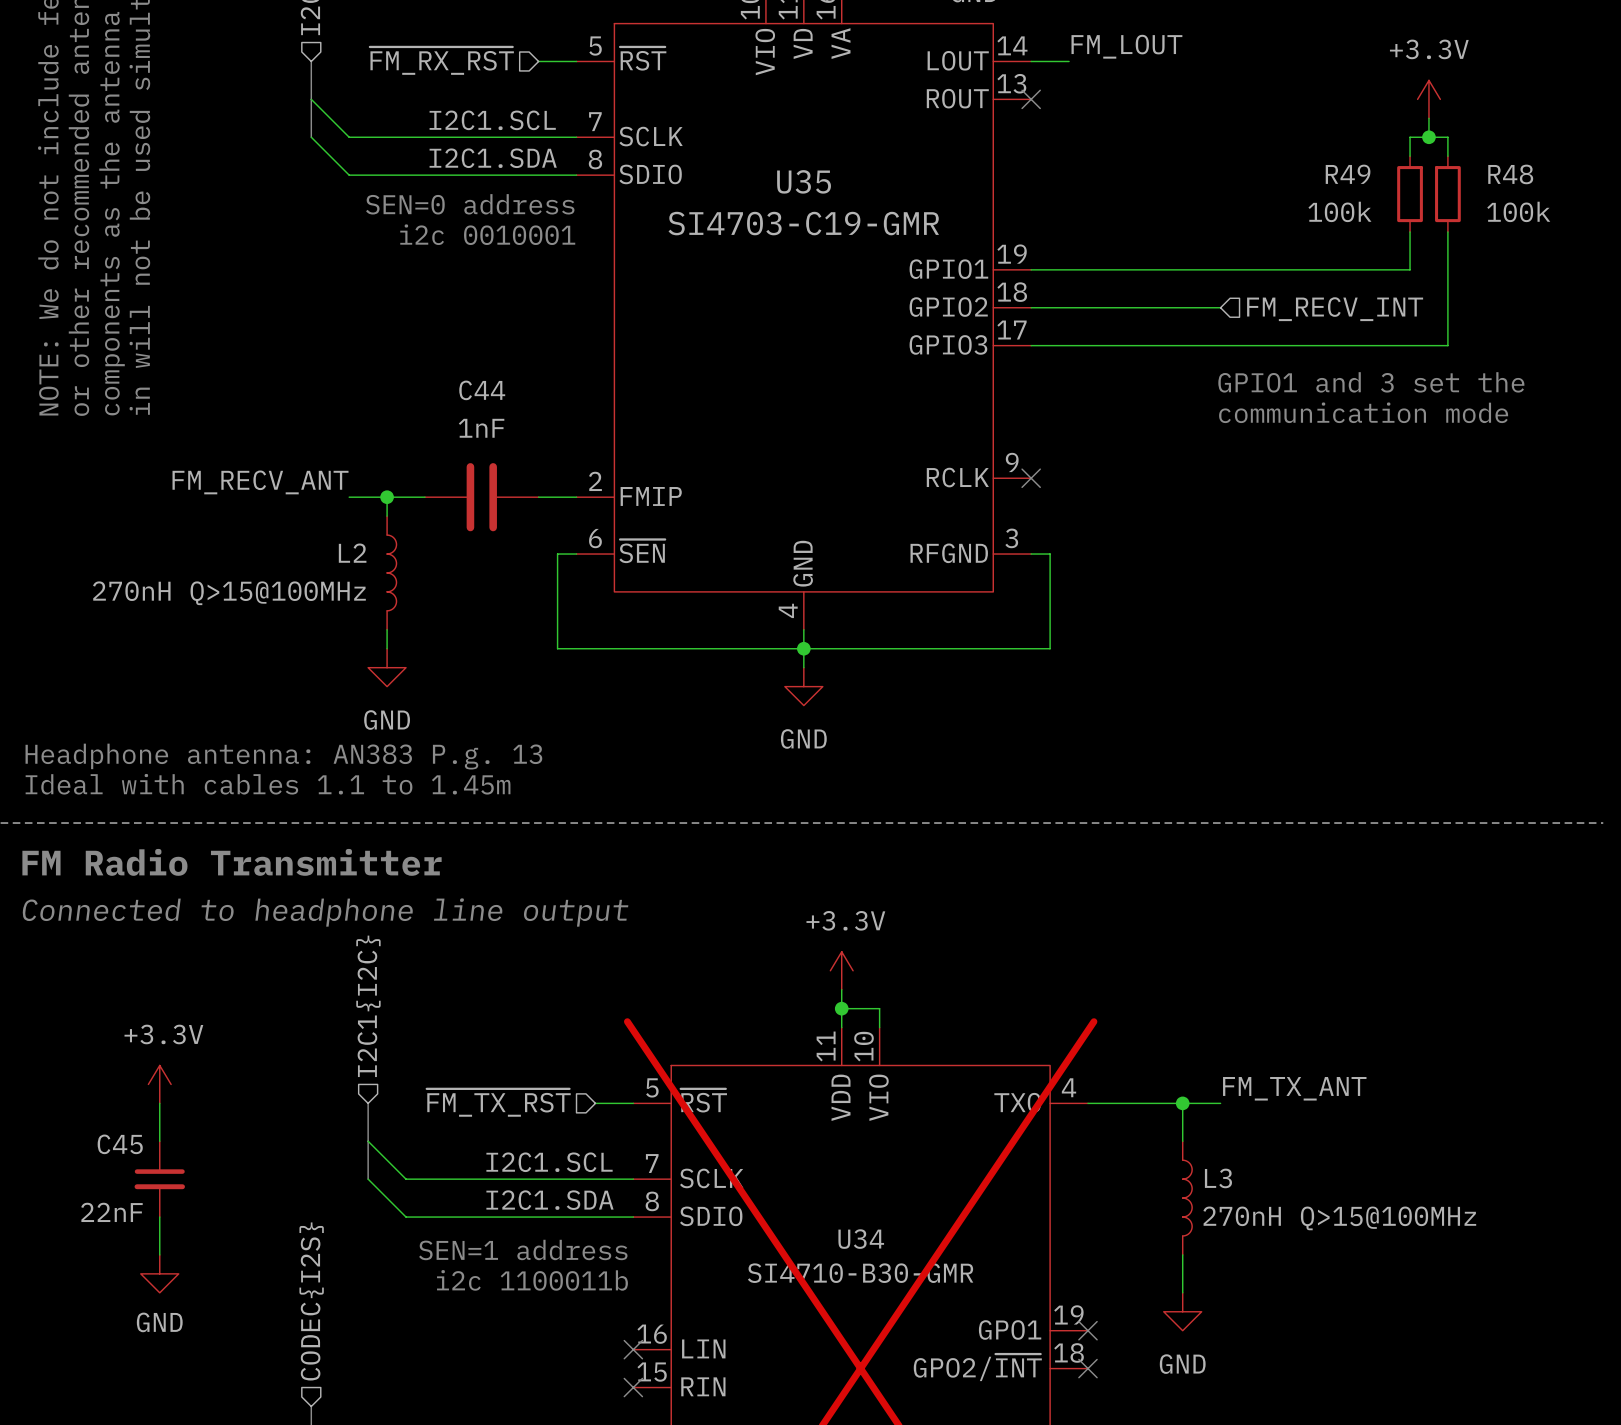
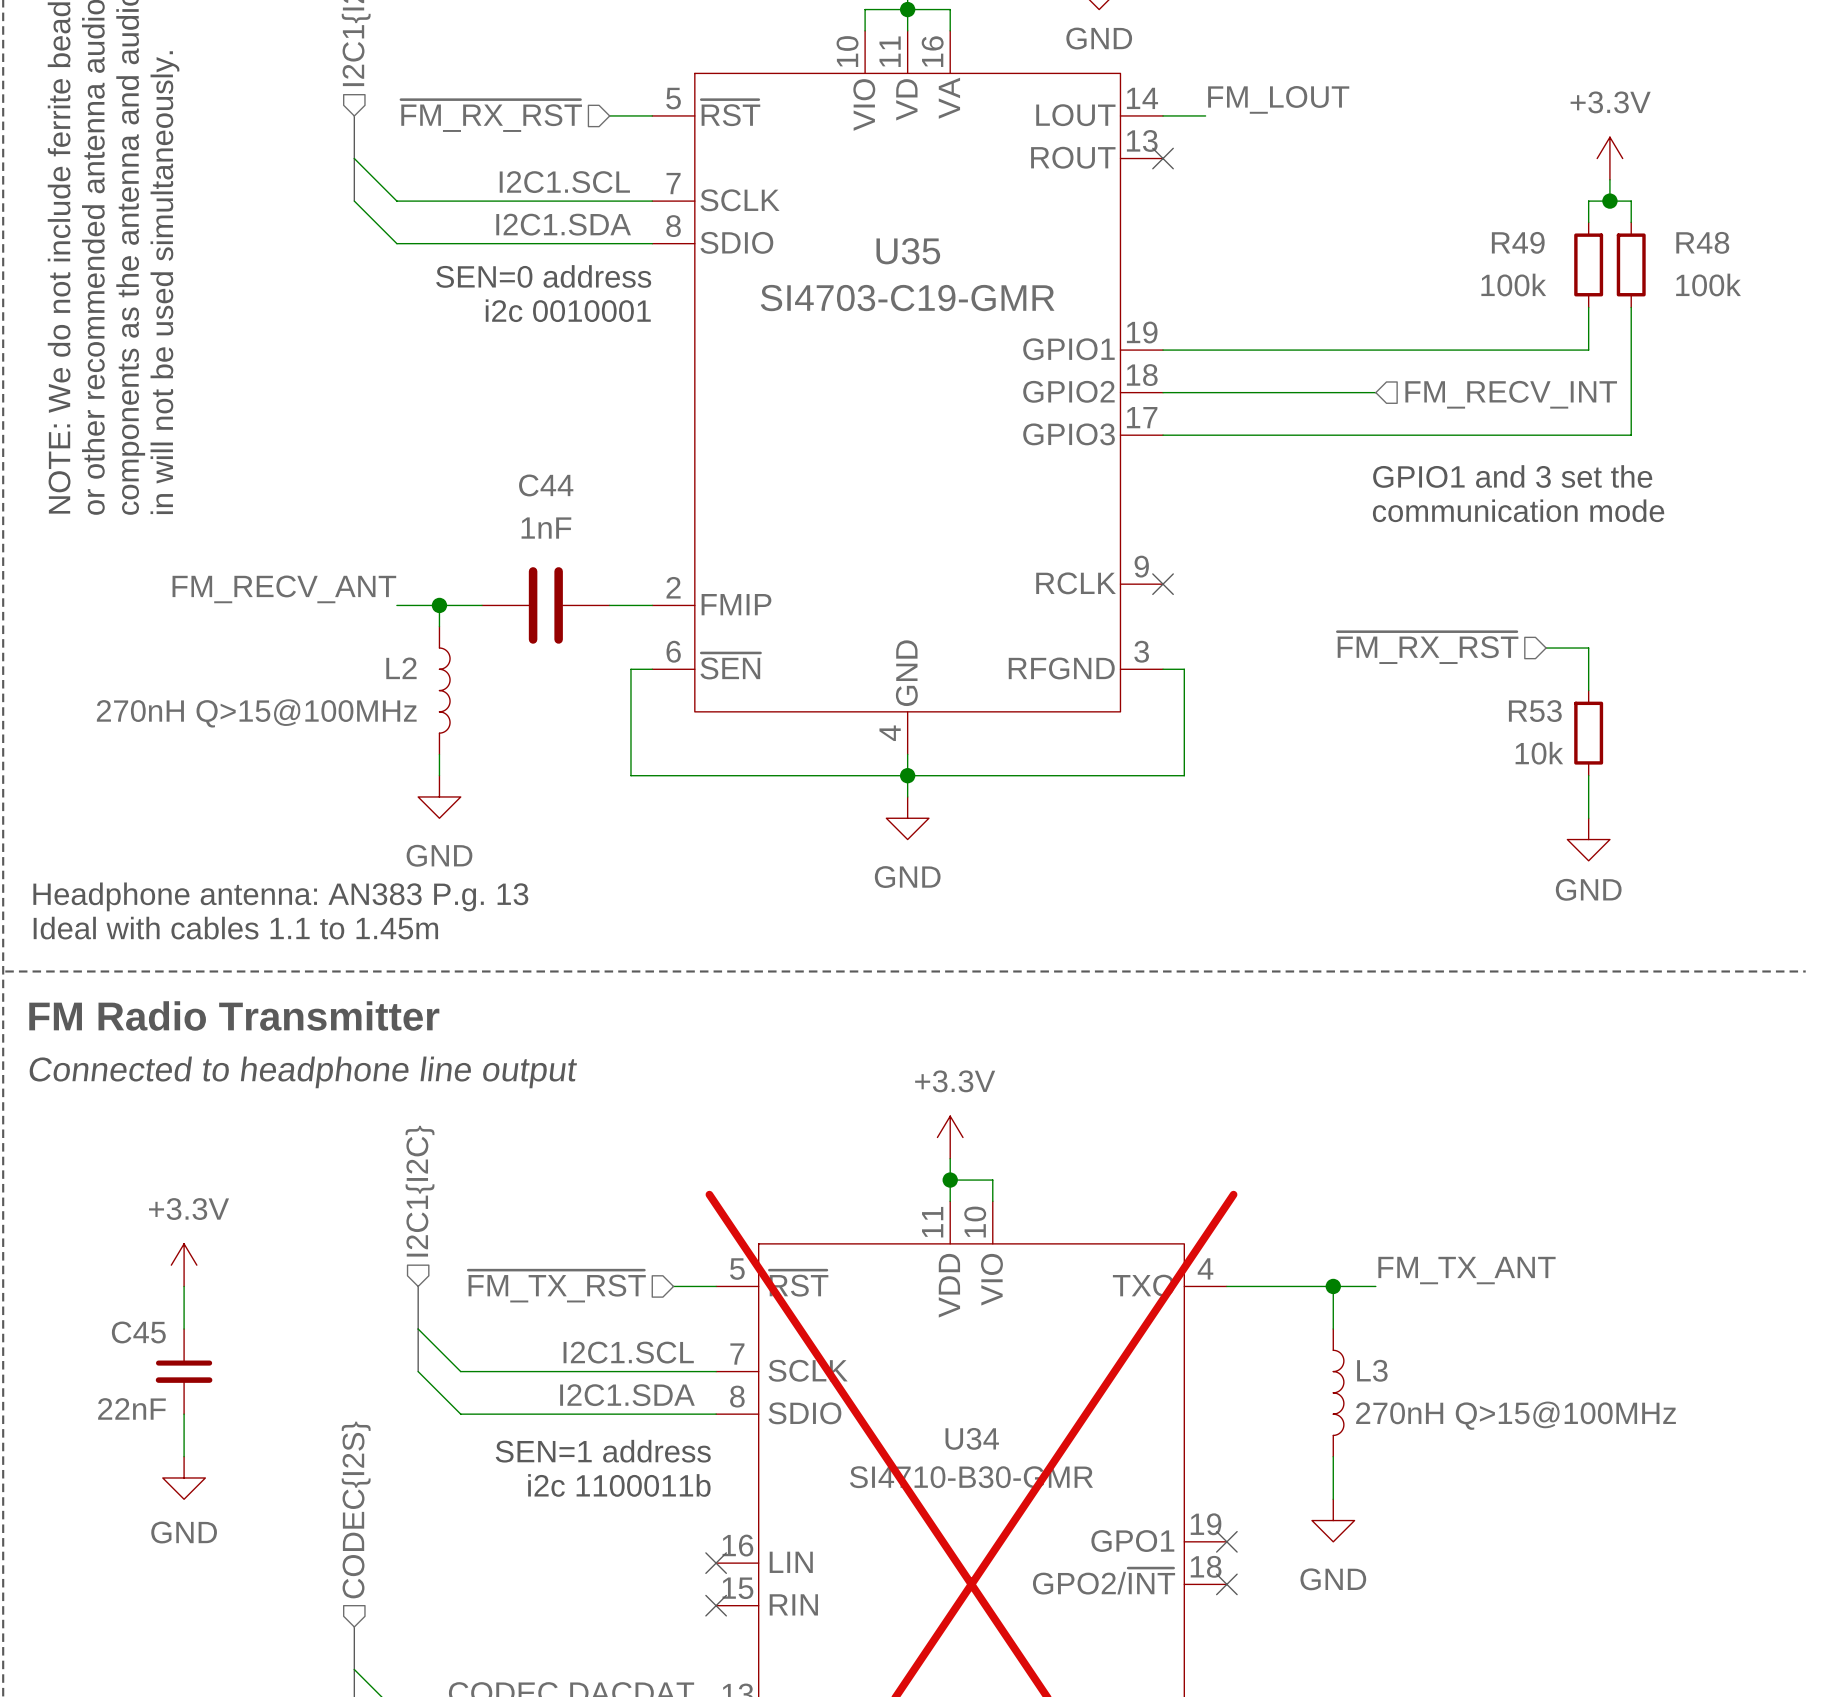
hierarchical label: none -> ~{FM_RX_RST} (1427, 647)
wire: none -> (1546, 648) (1588, 648) (1588, 690)
R53: none -> 10k (1588, 733)
wire: none -> (1588, 775) (1588, 818)
power symbol: none -> GND (1588, 839)

